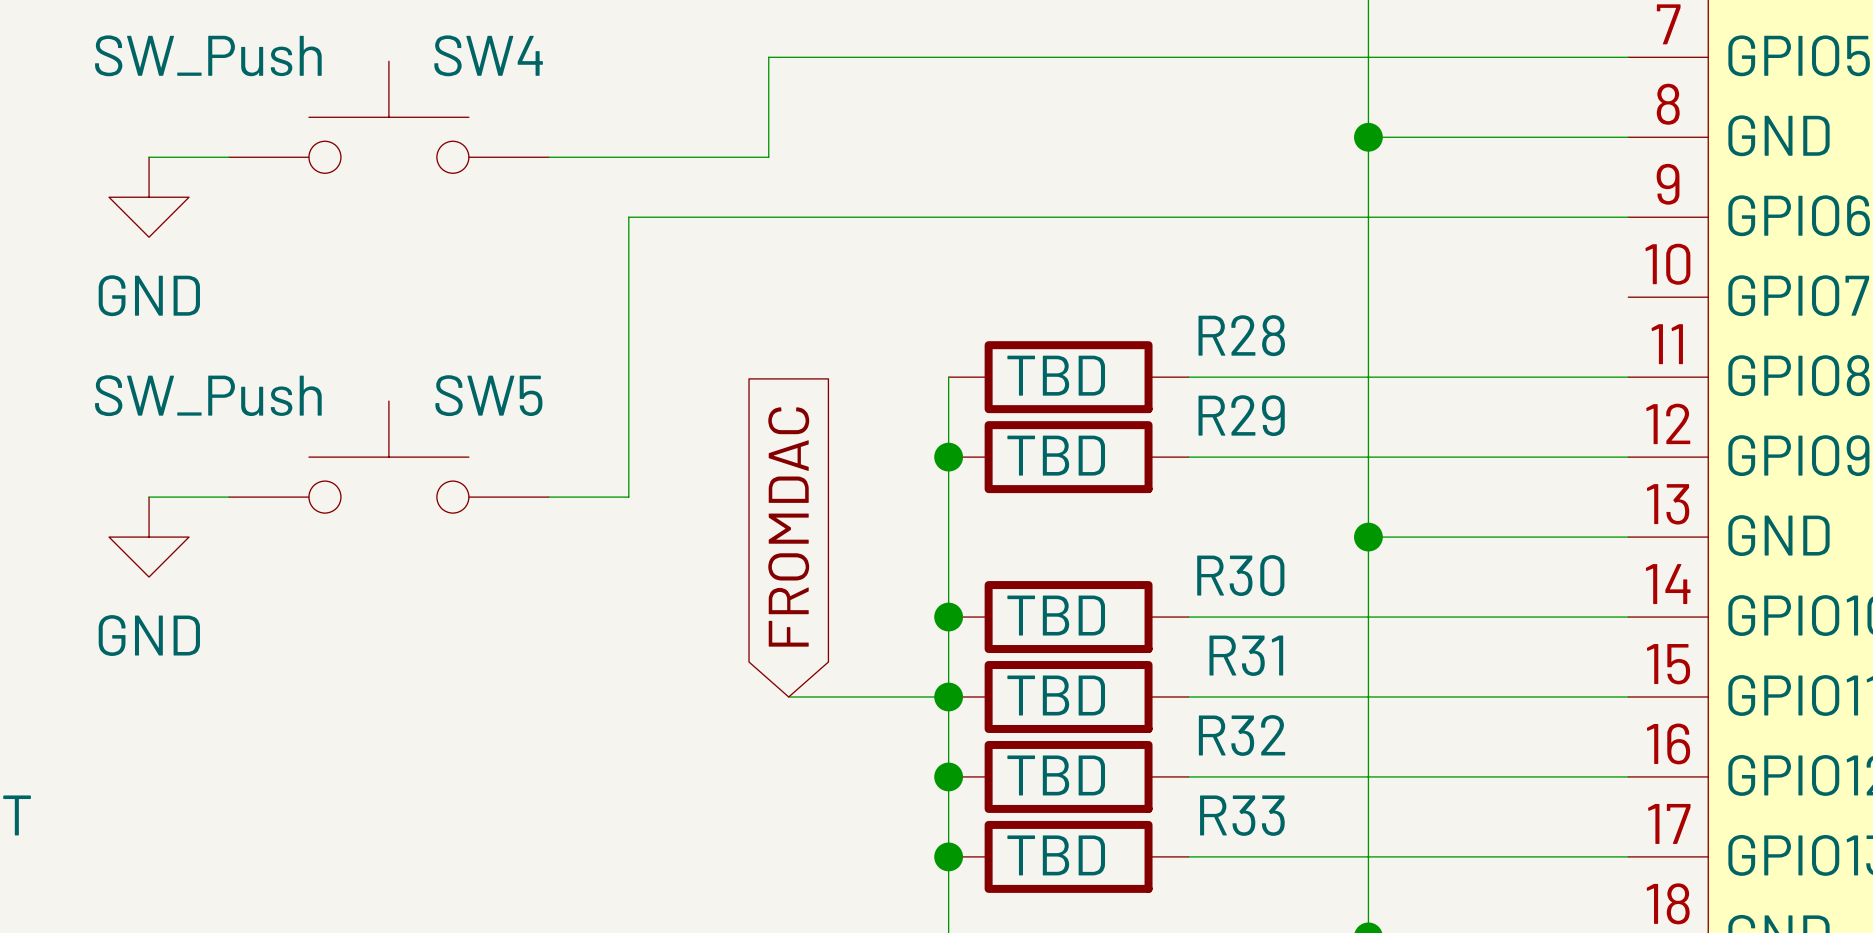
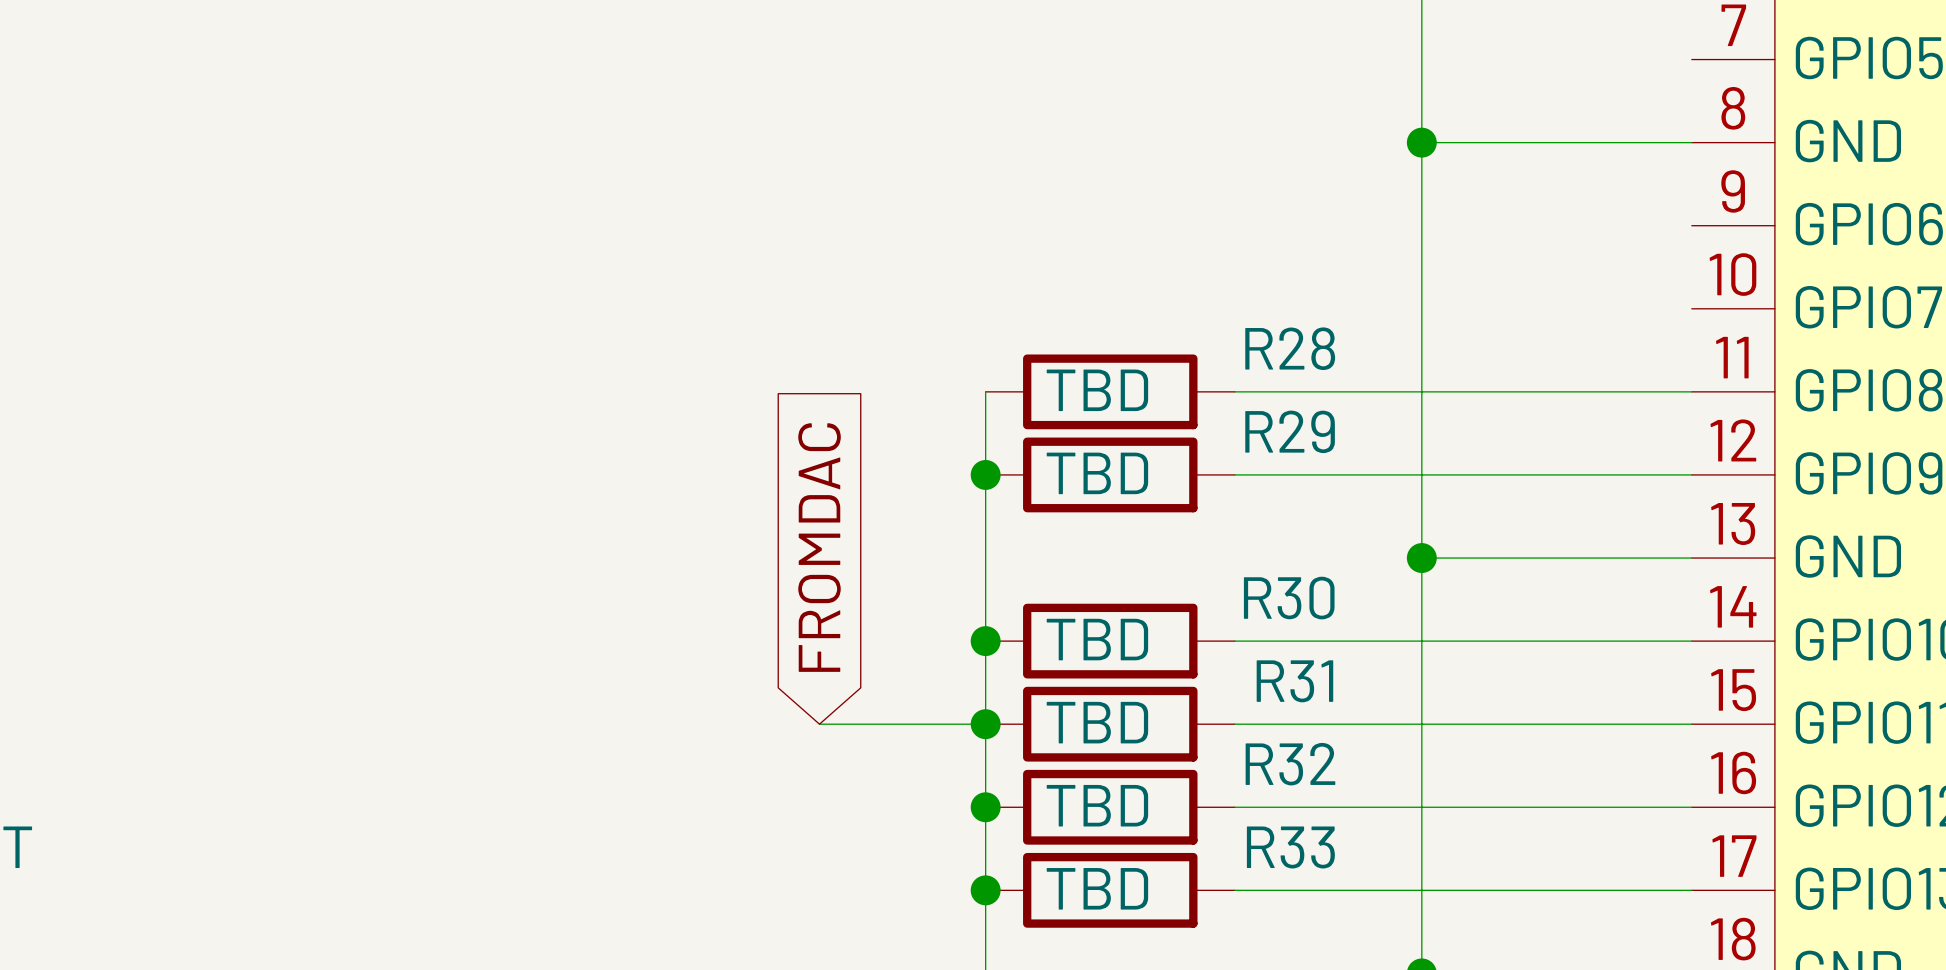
wire: (1628, 57) (768, 57) (768, 157) (548, 157) -> none
SW4: SW_Push (388, 117) -> none
wire: (149, 157) (229, 157) -> none
power symbol: GND (149, 197) -> none
wire: (1628, 217) (628, 217) (628, 497) (548, 497) -> none
SW5: SW_Push (388, 457) -> none
wire: (149, 497) (229, 497) -> none
power symbol: GND (149, 537) -> none

